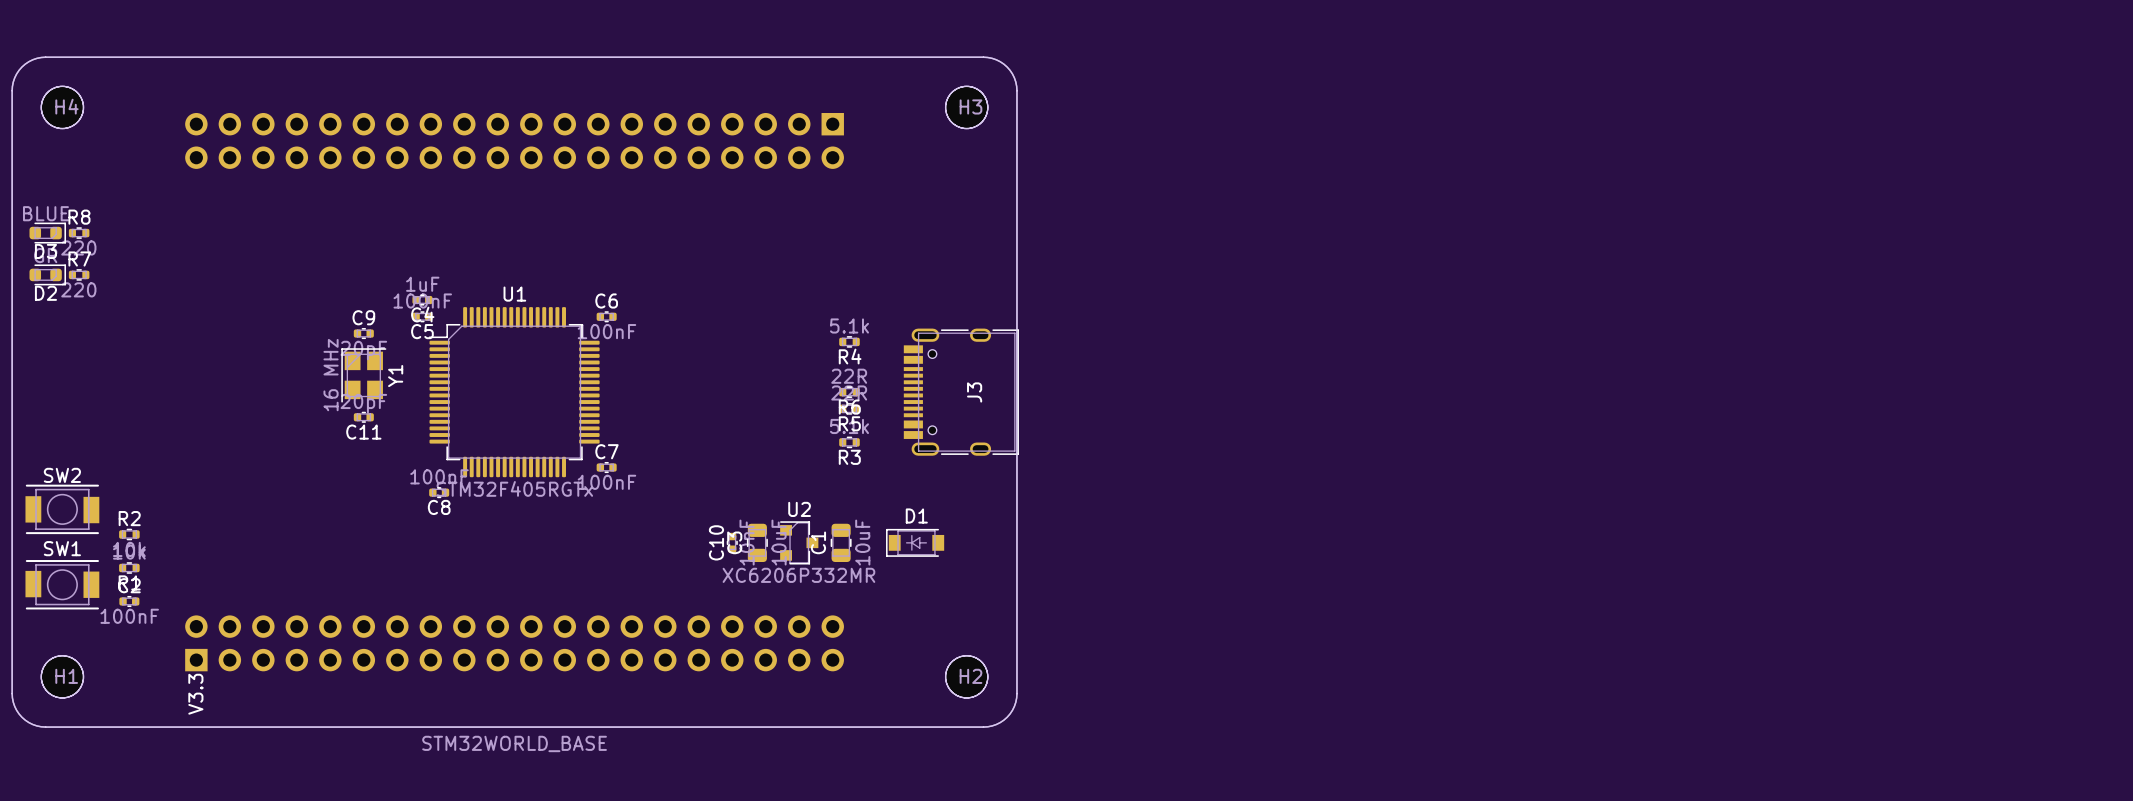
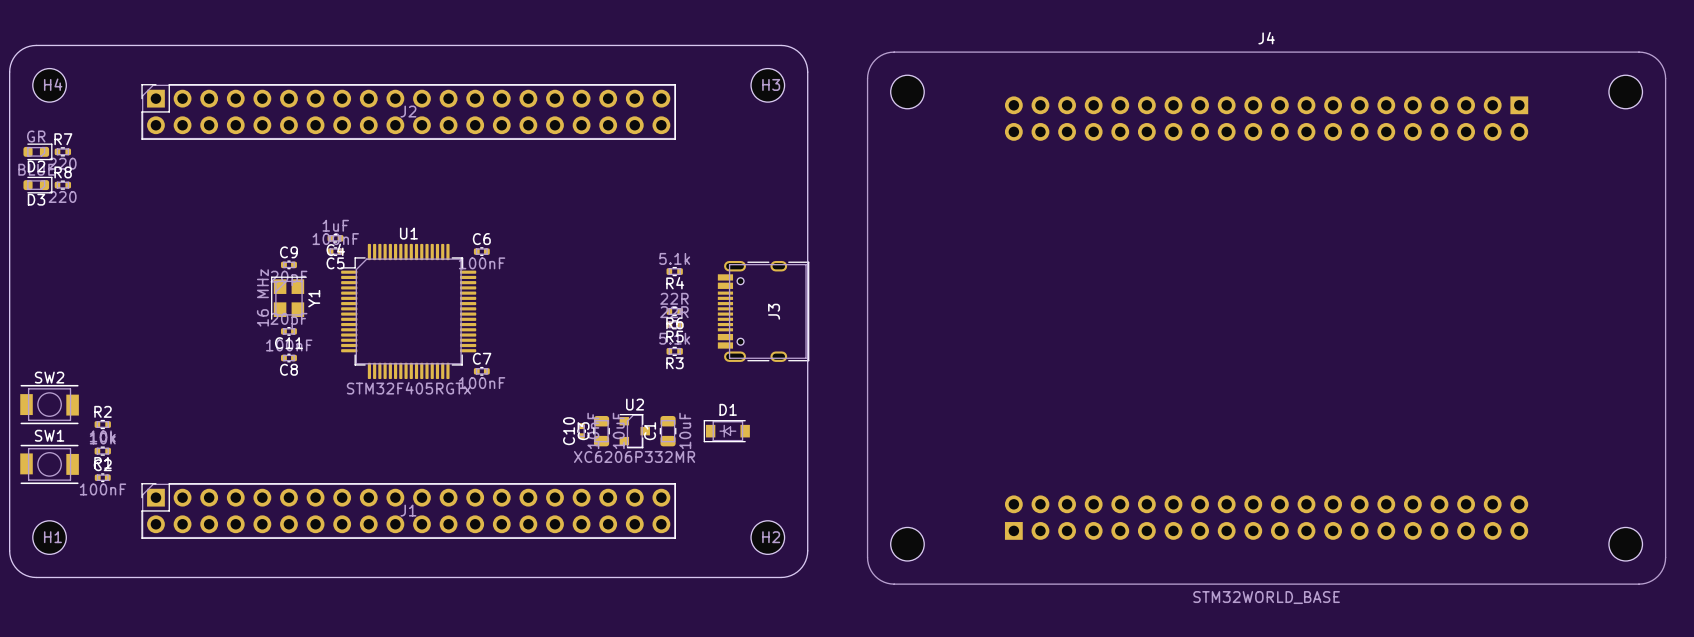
J2: none -> (408, 111)
D2 position: (47, 274) -> (37, 151)
R7 position: (79, 274) -> (62, 151)
part: STM32WORLD_BASE (514, 392) -> none
J4: none -> STM32WORLD_BASE (1266, 318)
C8 position: (439, 492) -> (288, 358)
J1: none -> (408, 510)

